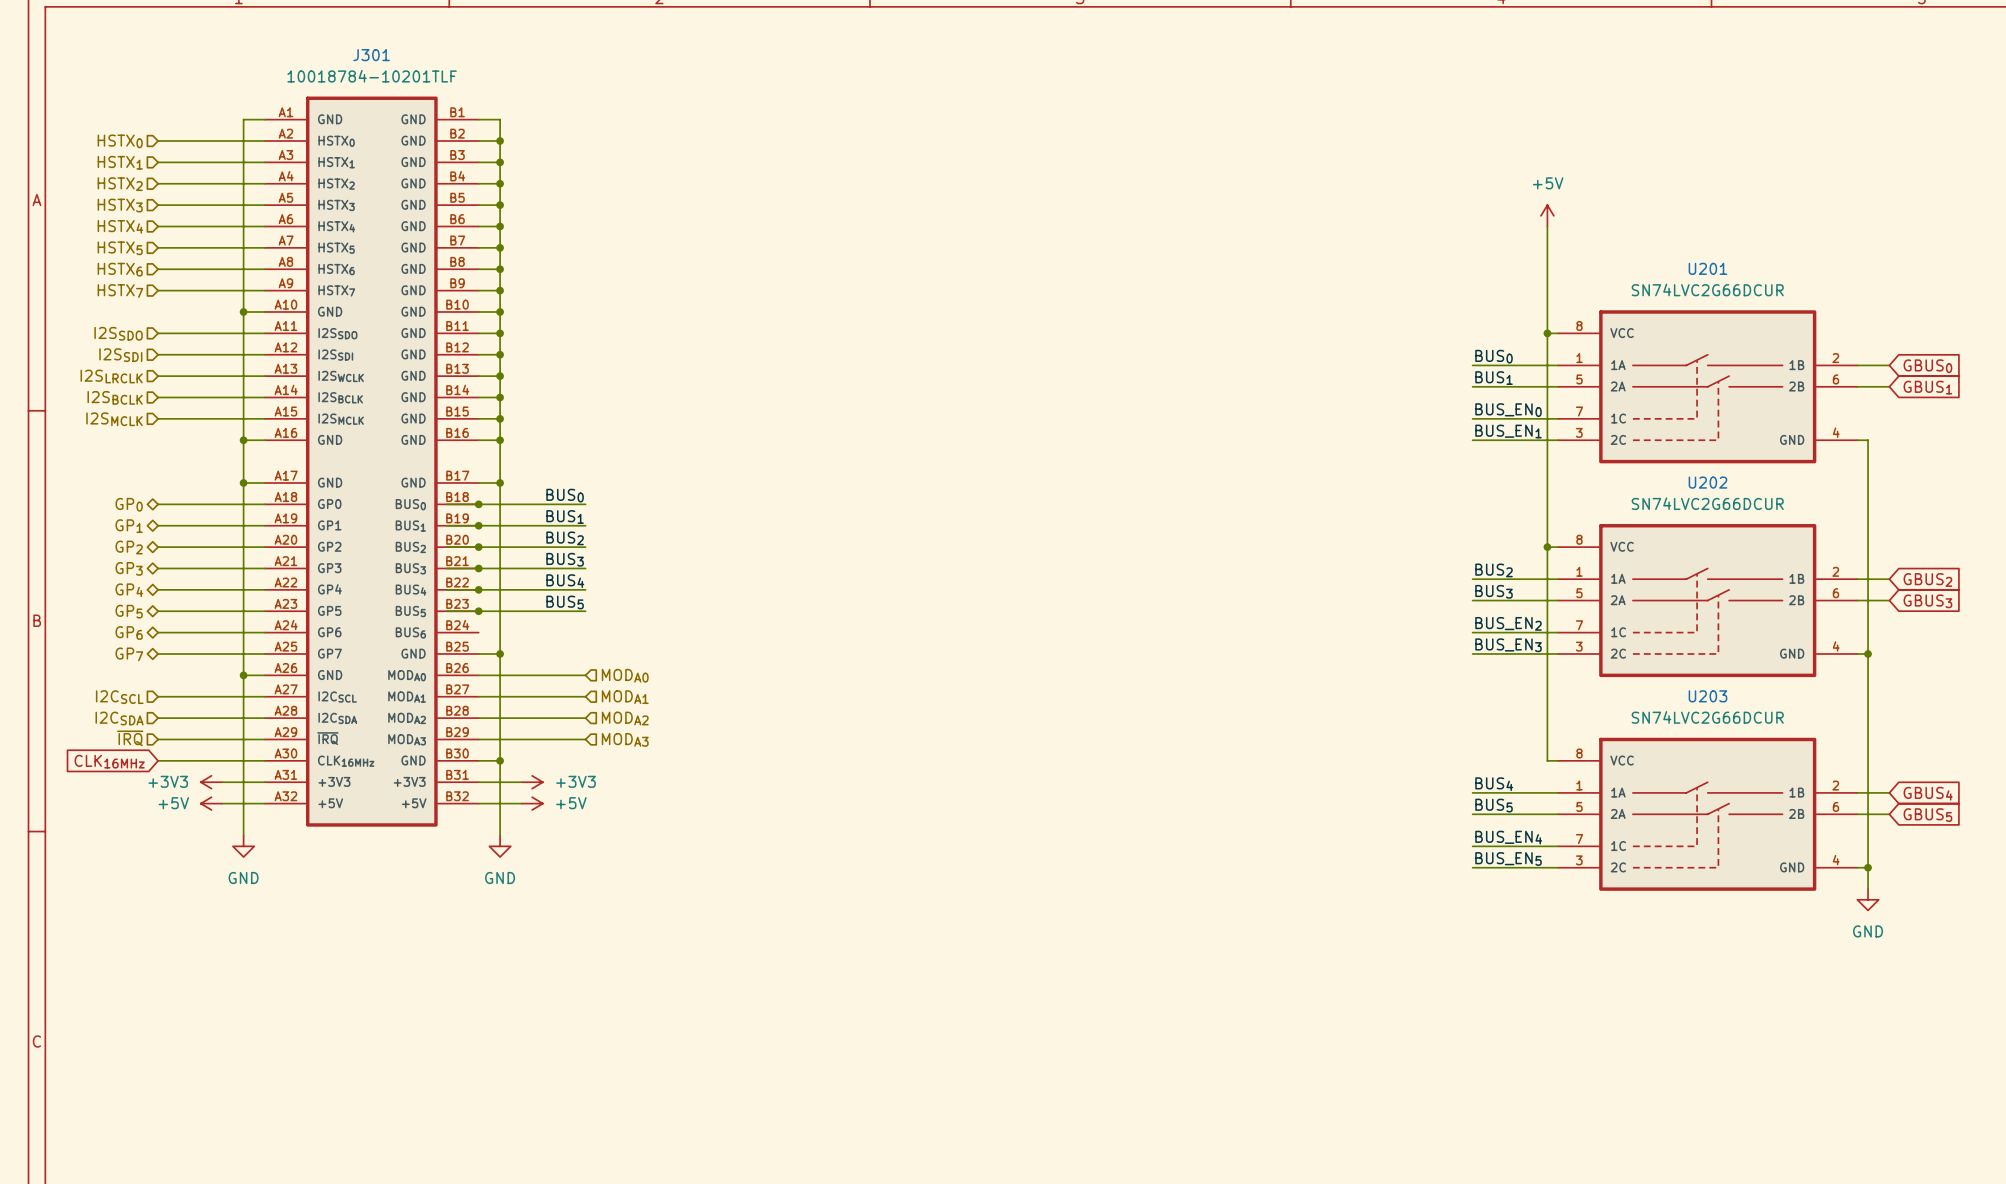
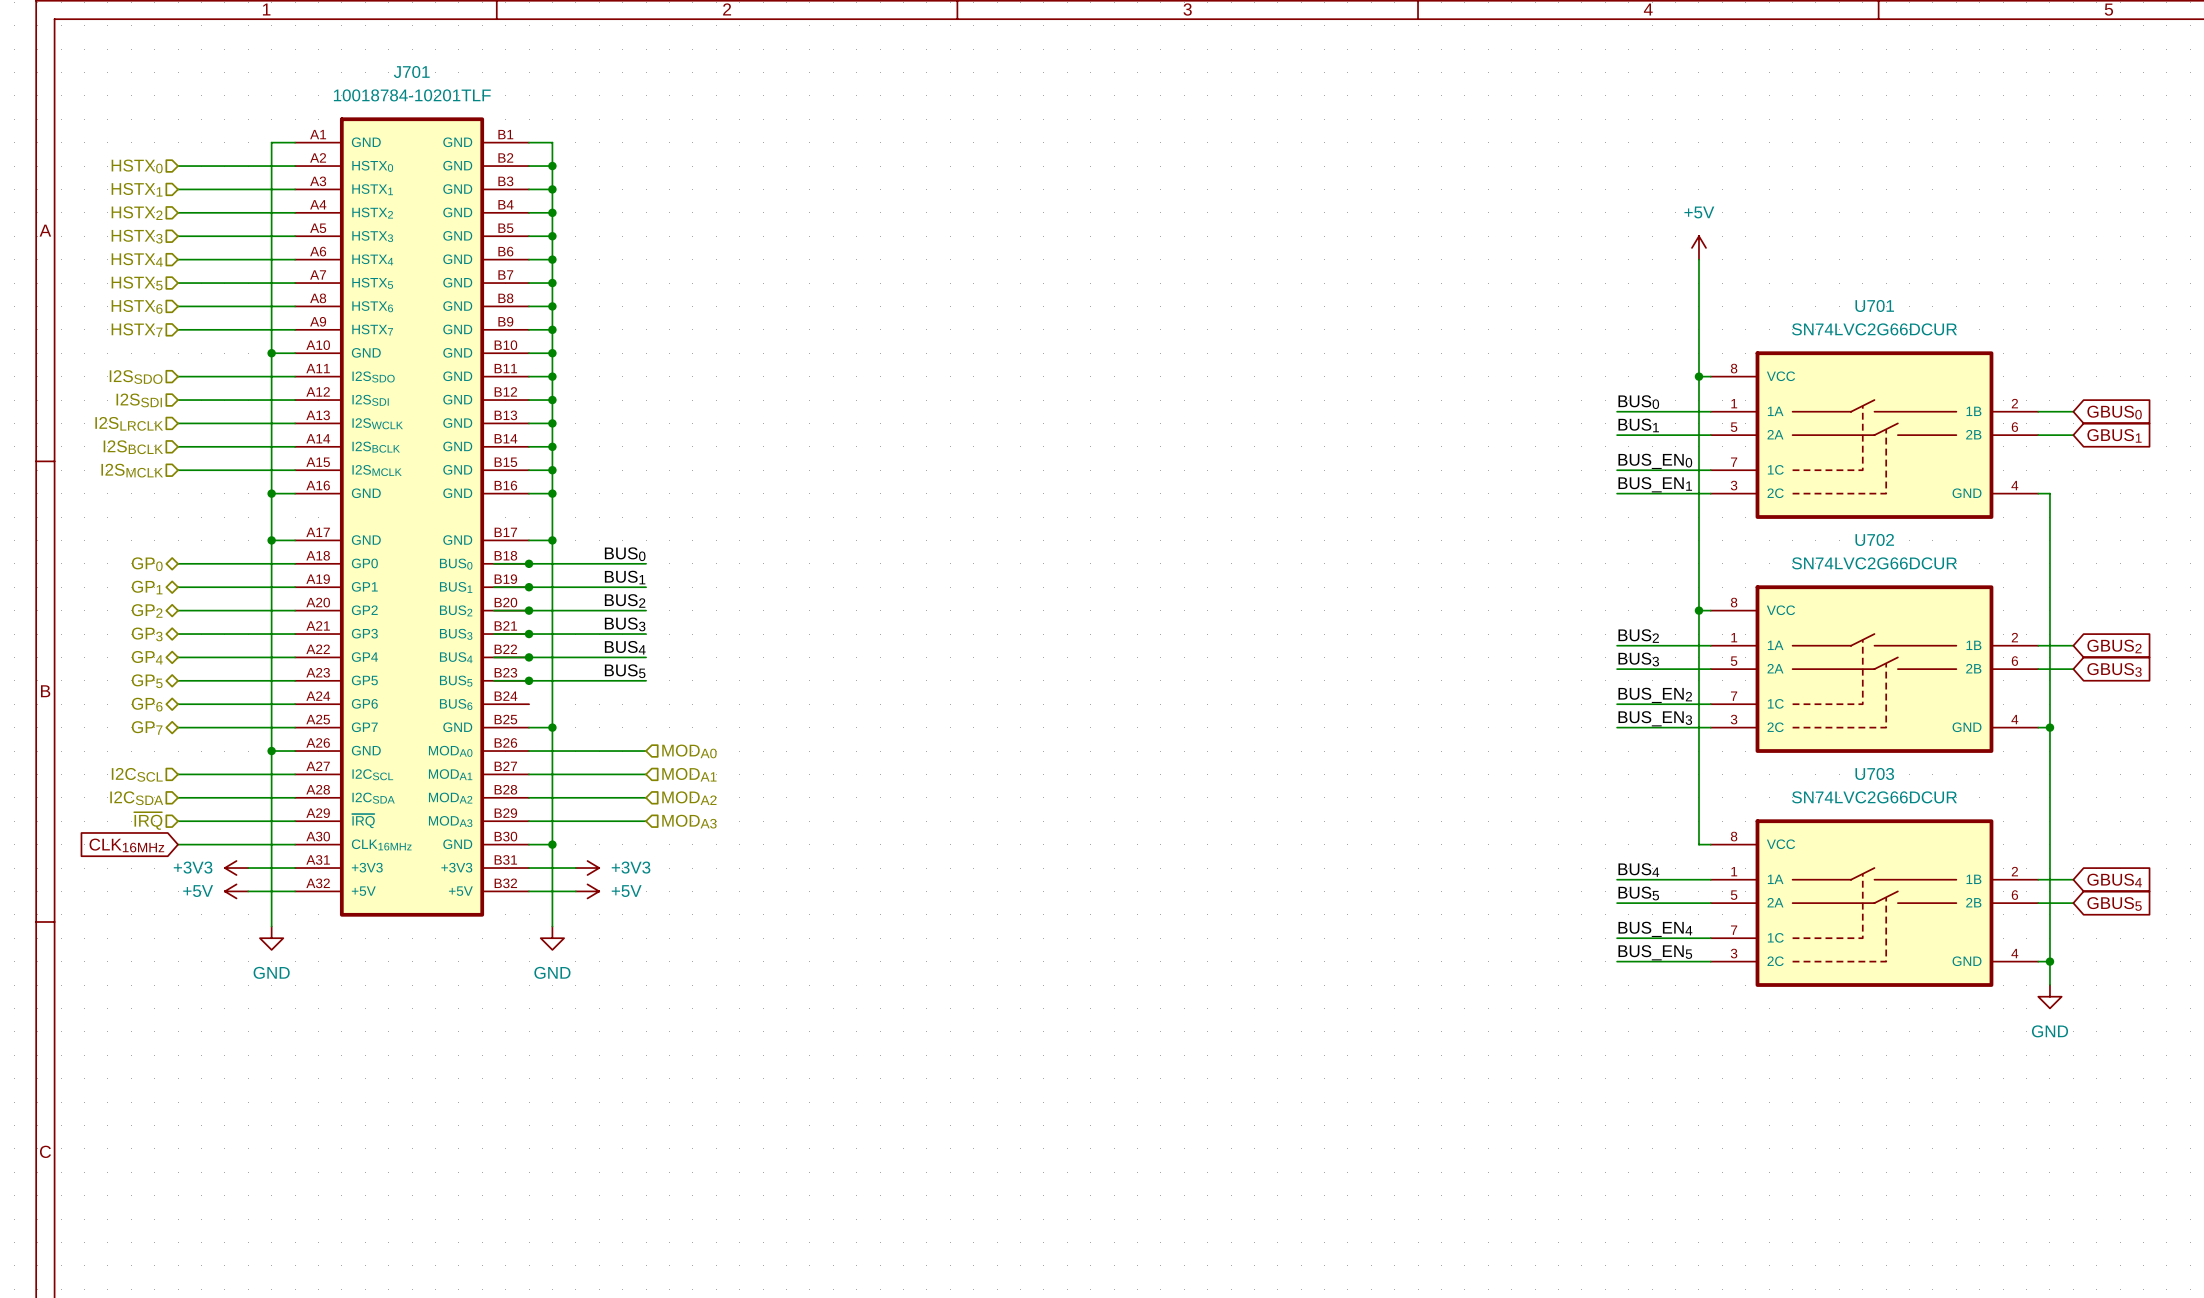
J301 name: J301 (371, 55) -> J701 (411, 71)
U201 name: U201 (1707, 268) -> U701 (1874, 305)
U202 name: U202 (1707, 482) -> U702 (1874, 539)
U203 name: U203 (1707, 696) -> U703 (1874, 773)

